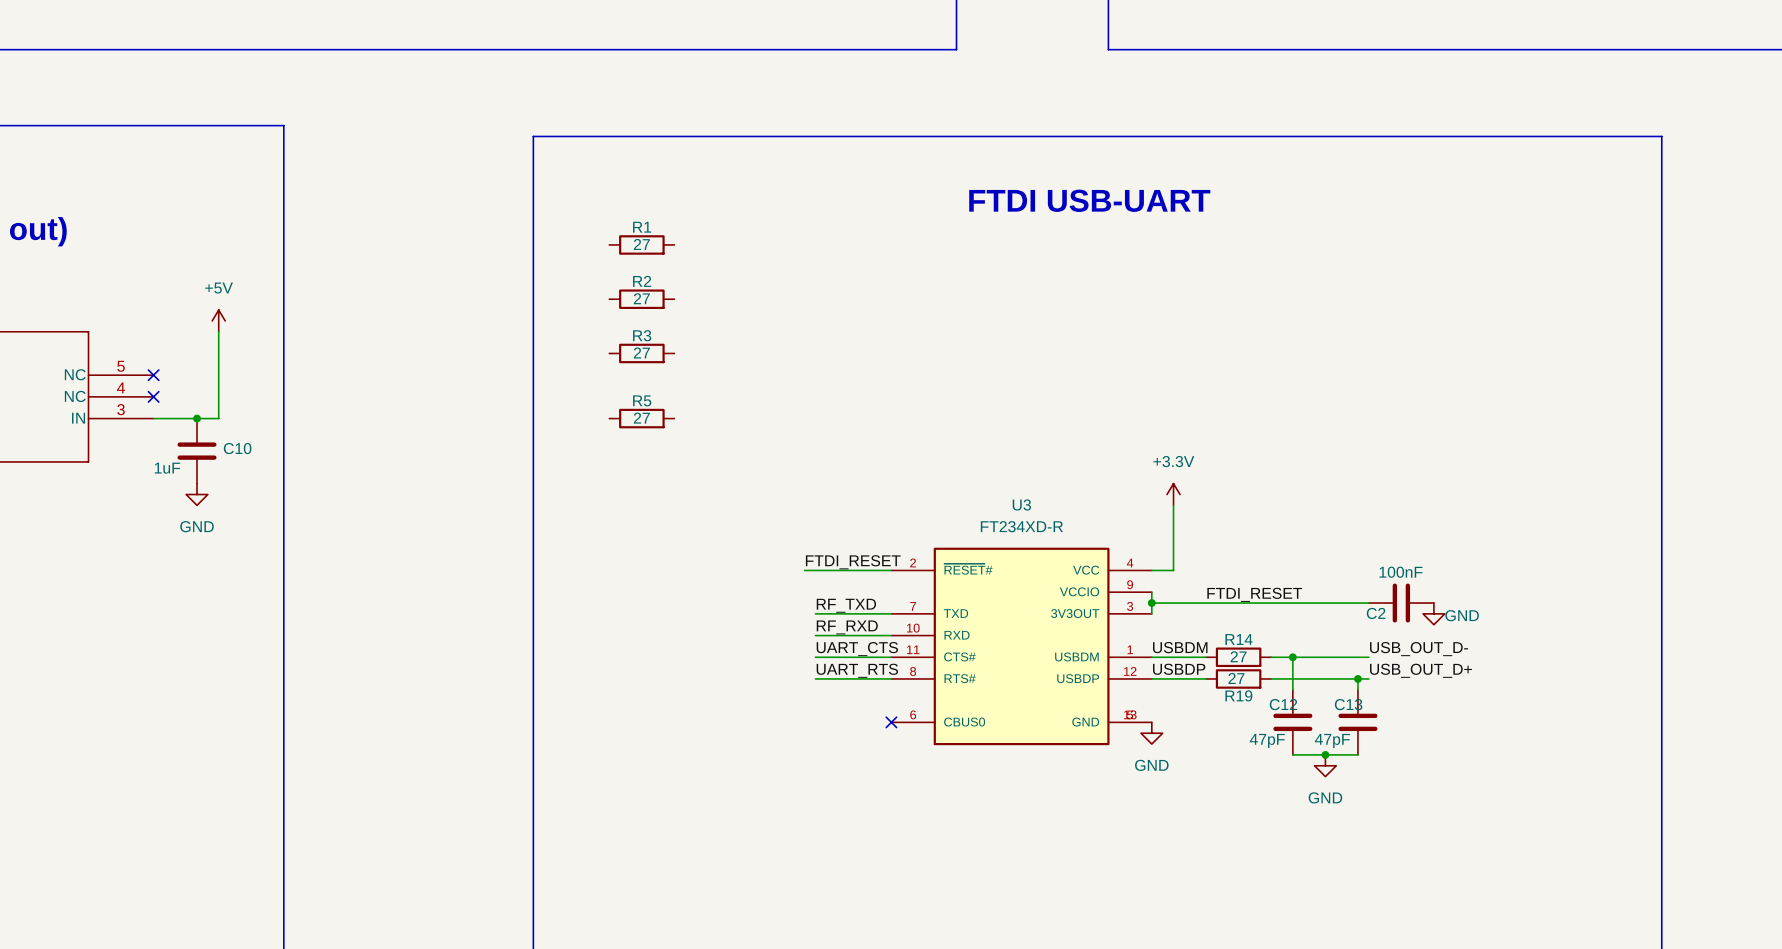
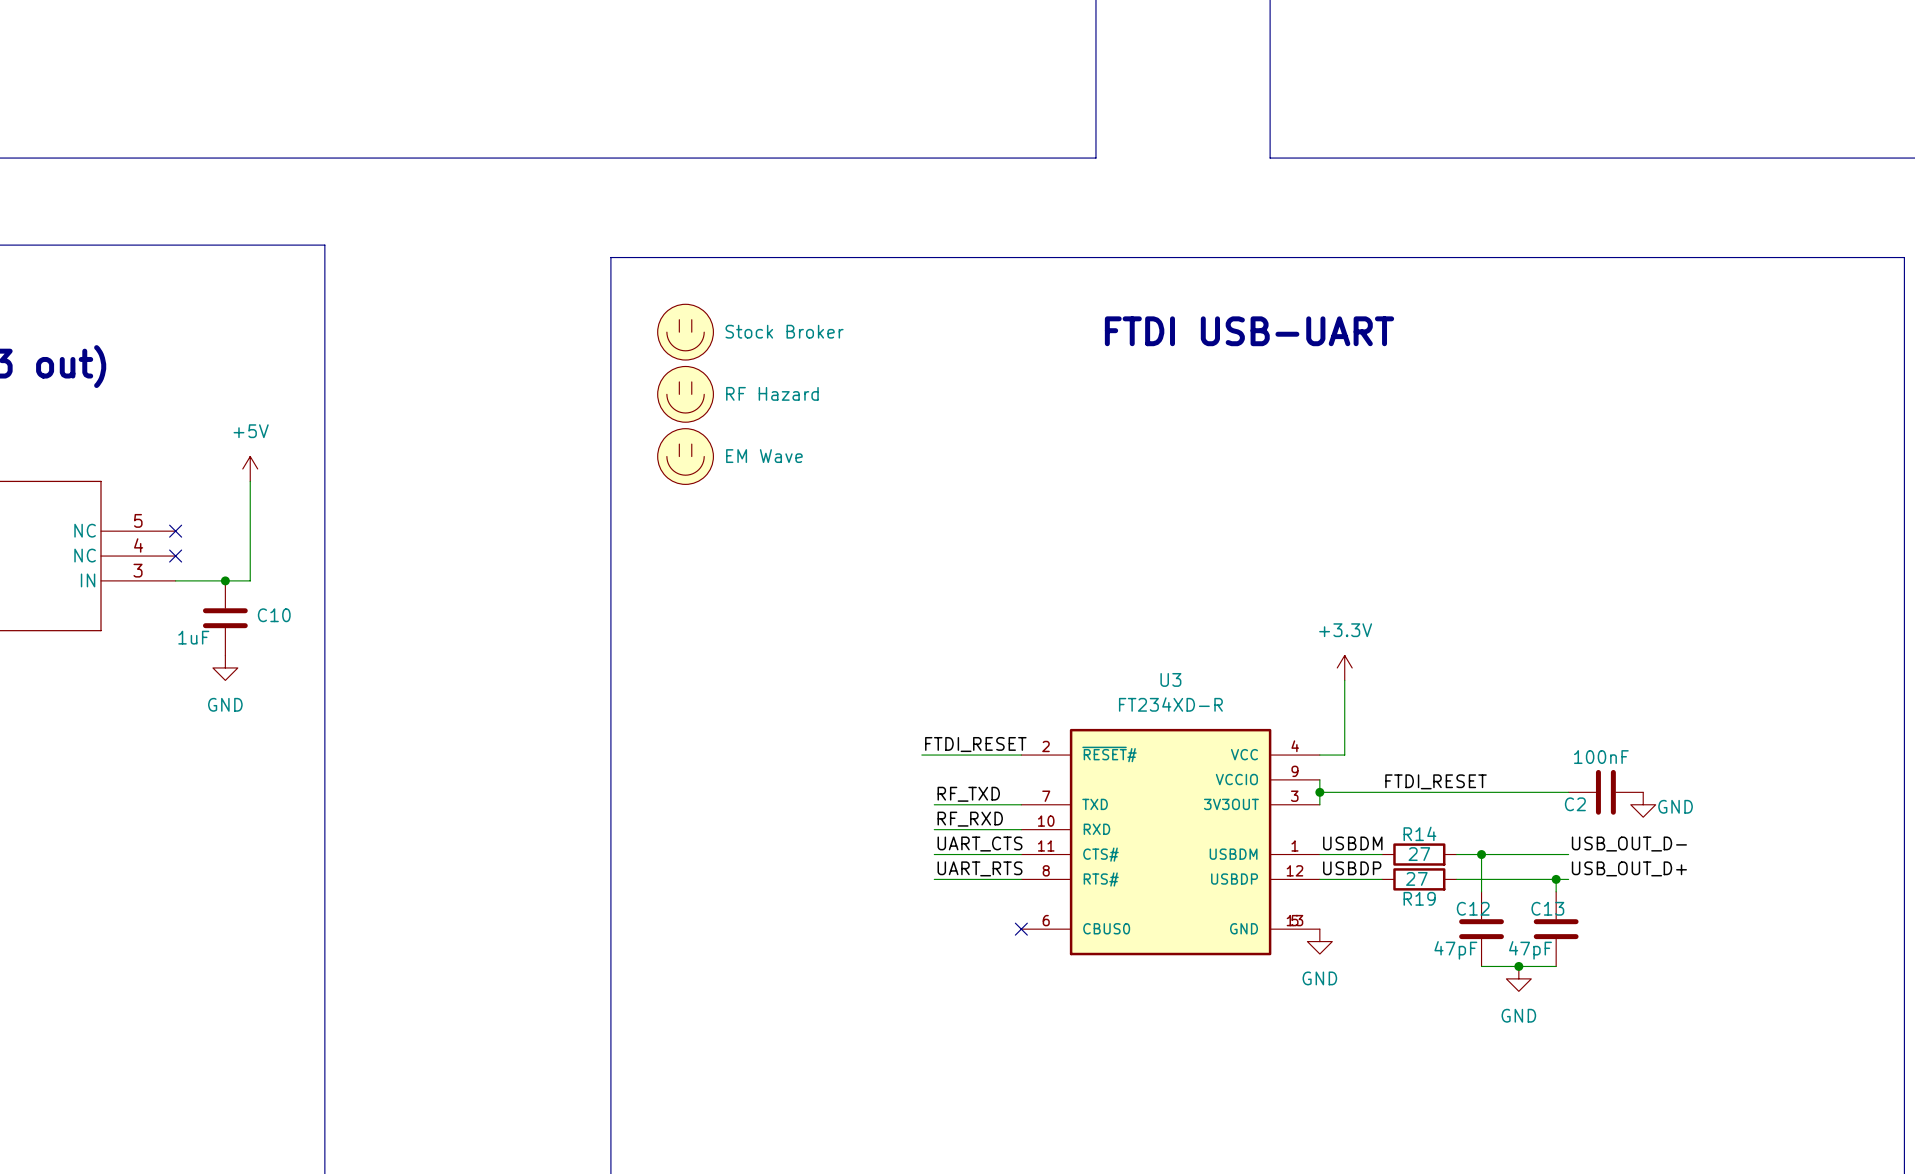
part: none -> Stock Broker (685, 332)
R1: 27 (641, 244) -> none
part: none -> RF Hazard (685, 394)
R2: 27 (641, 299) -> none
part: none -> EM Wave (685, 456)
R3: 27 (641, 353) -> none
R5: 27 (641, 418) -> none

